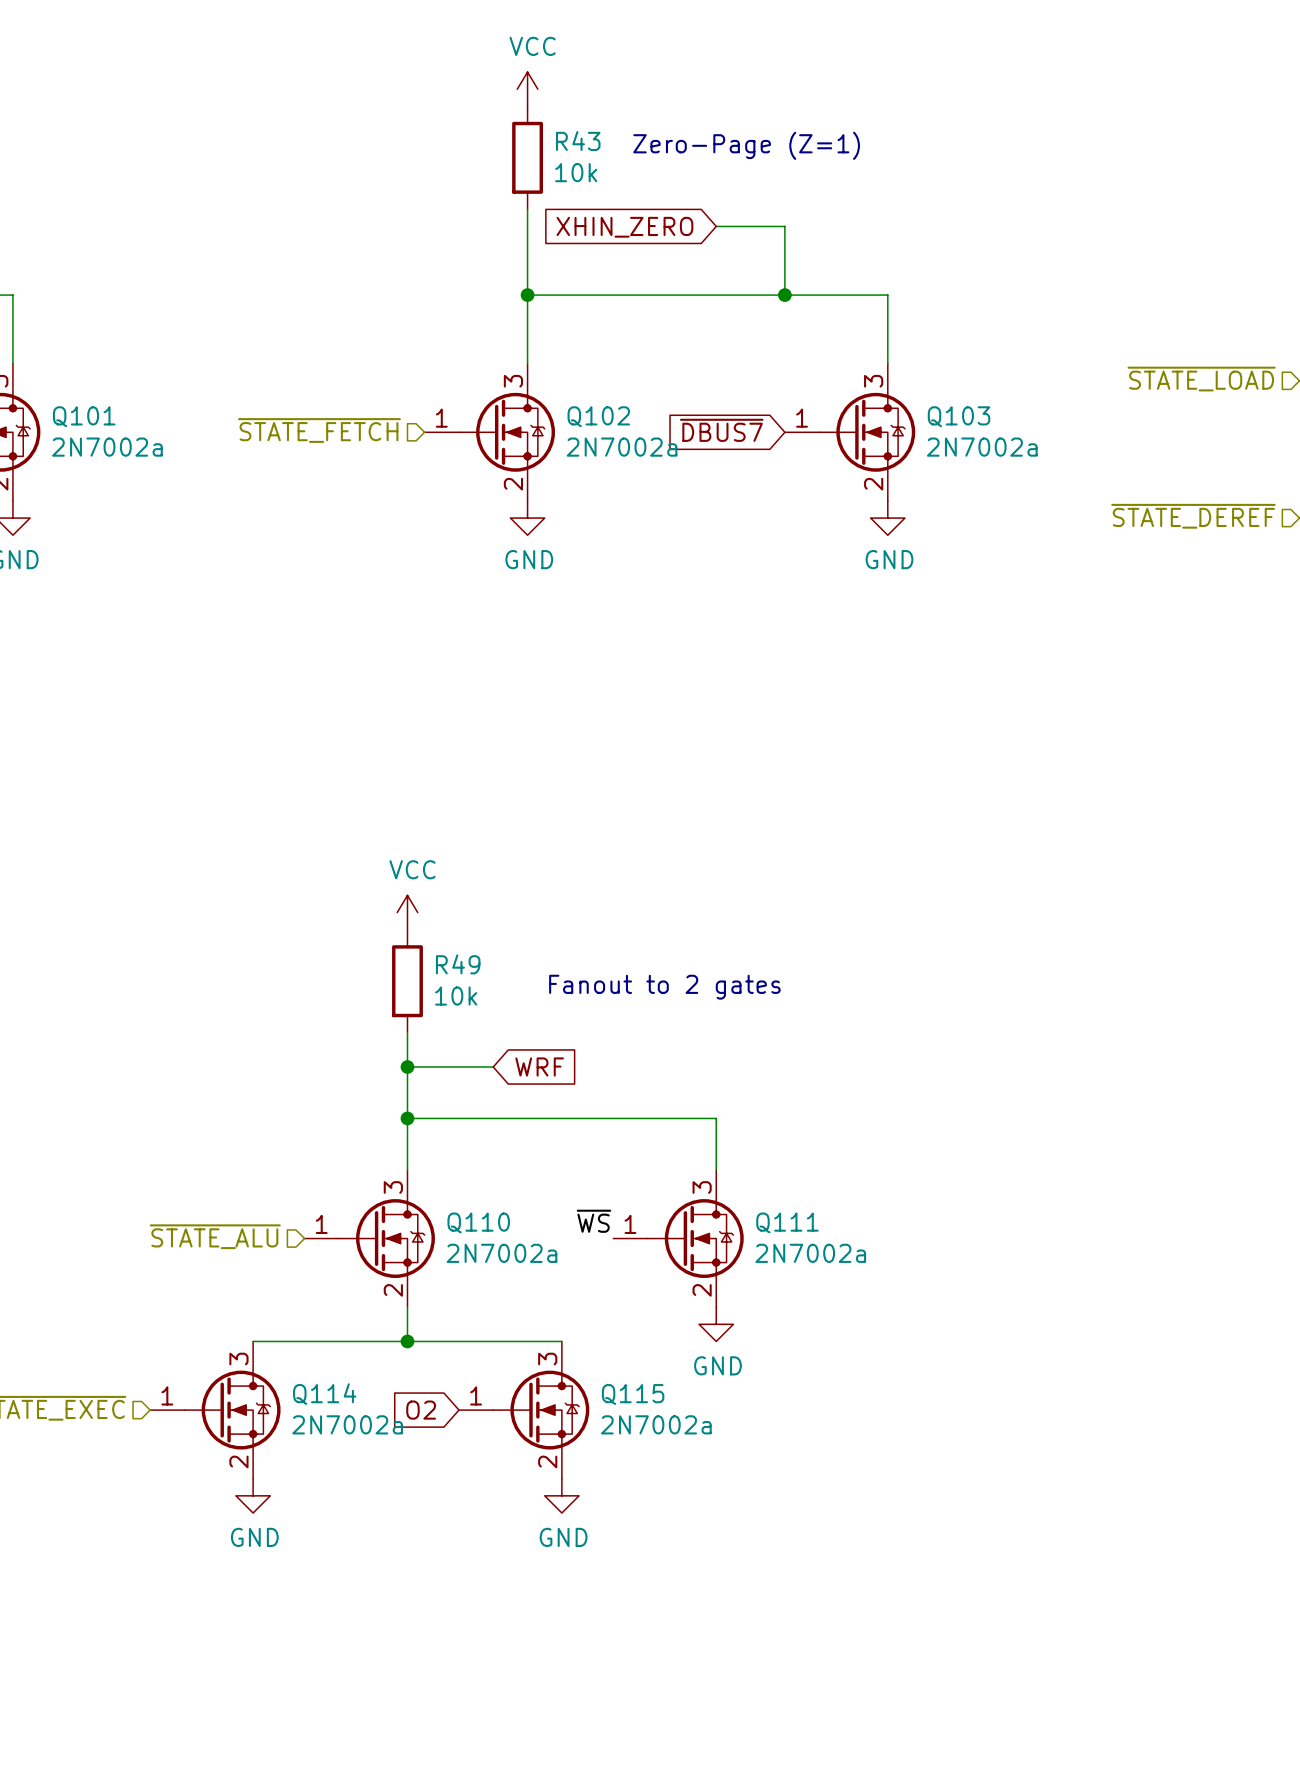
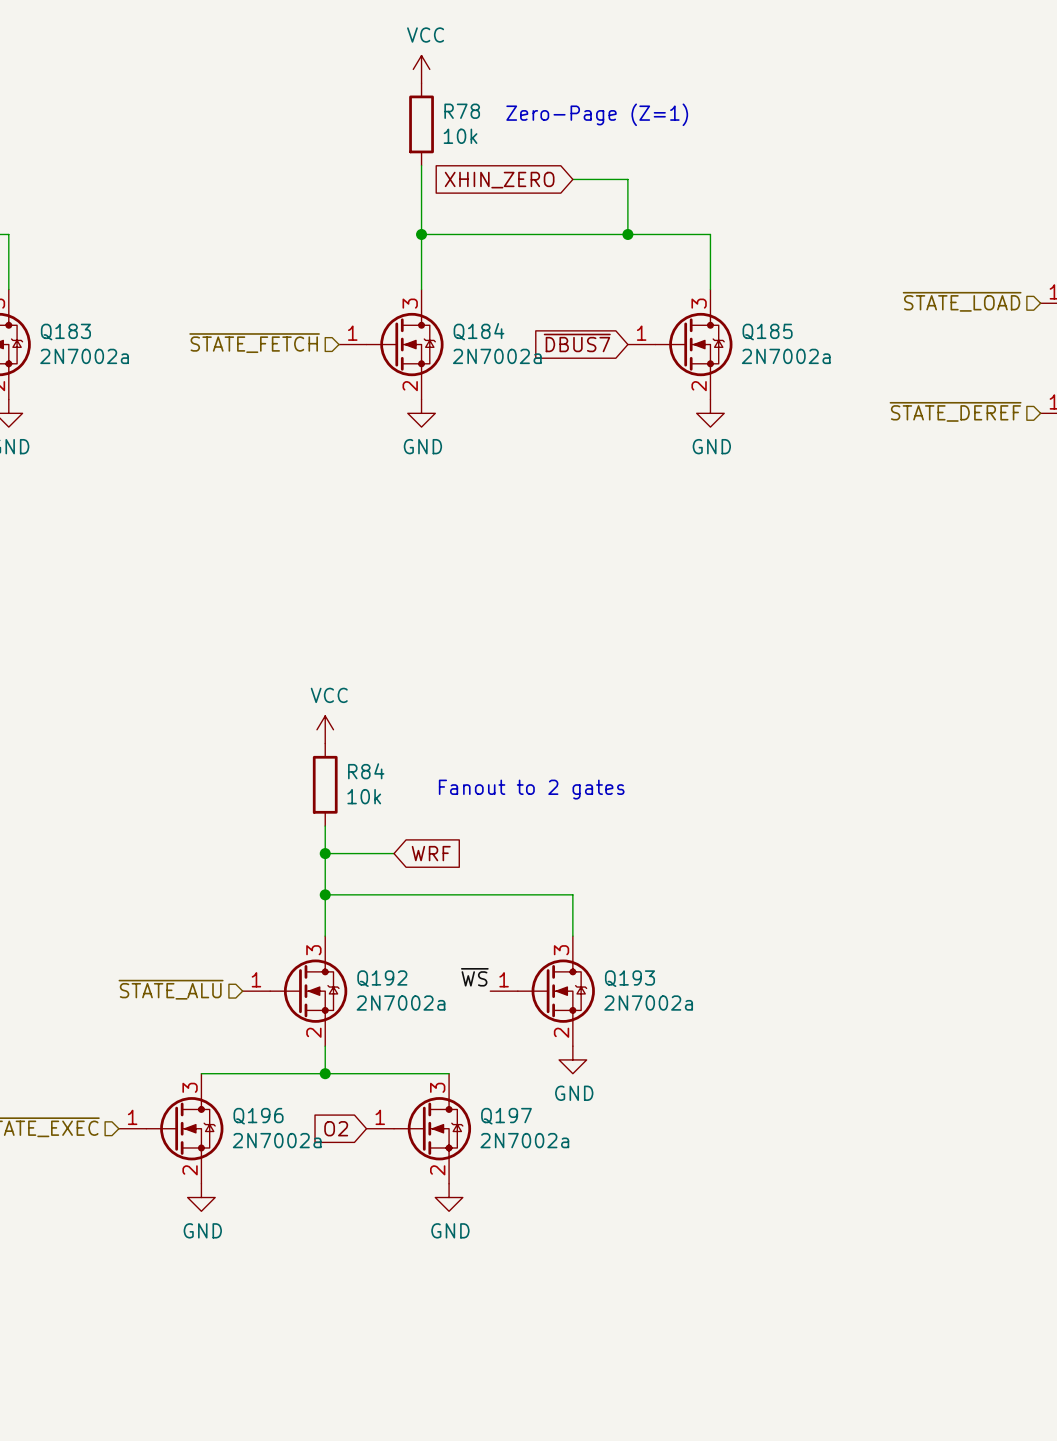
R43 name: R43 (578, 141) -> R78 (462, 111)
Q101 name: Q101 (84, 416) -> Q183 (65, 332)
Q102 name: Q102 (598, 416) -> Q184 (478, 331)
Q103 name: Q103 (959, 416) -> Q185 (767, 332)
R49 name: R49 (458, 964) -> R84 (366, 771)
Q110 name: Q110 (478, 1222) -> Q192 (382, 978)
Q111 name: Q111 (787, 1222) -> Q193 (629, 978)
Q114 name: Q114 (324, 1394) -> Q196 (258, 1116)
Q115 name: Q115 (633, 1394) -> Q197 (506, 1116)

